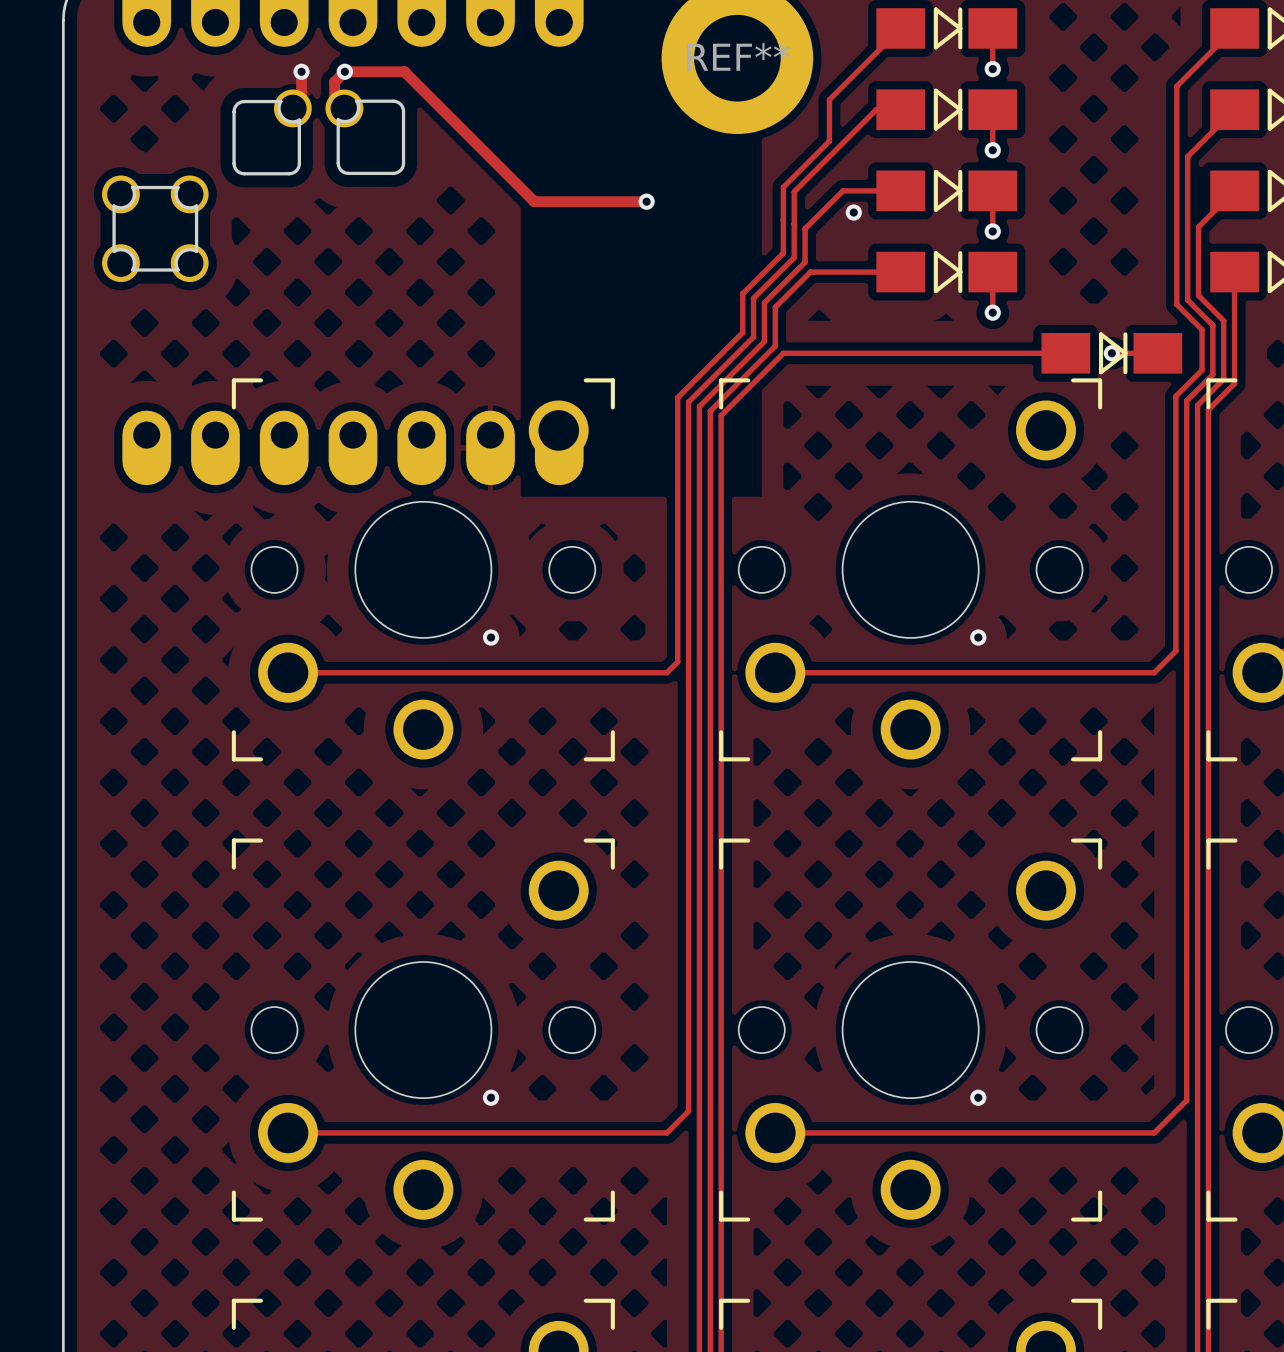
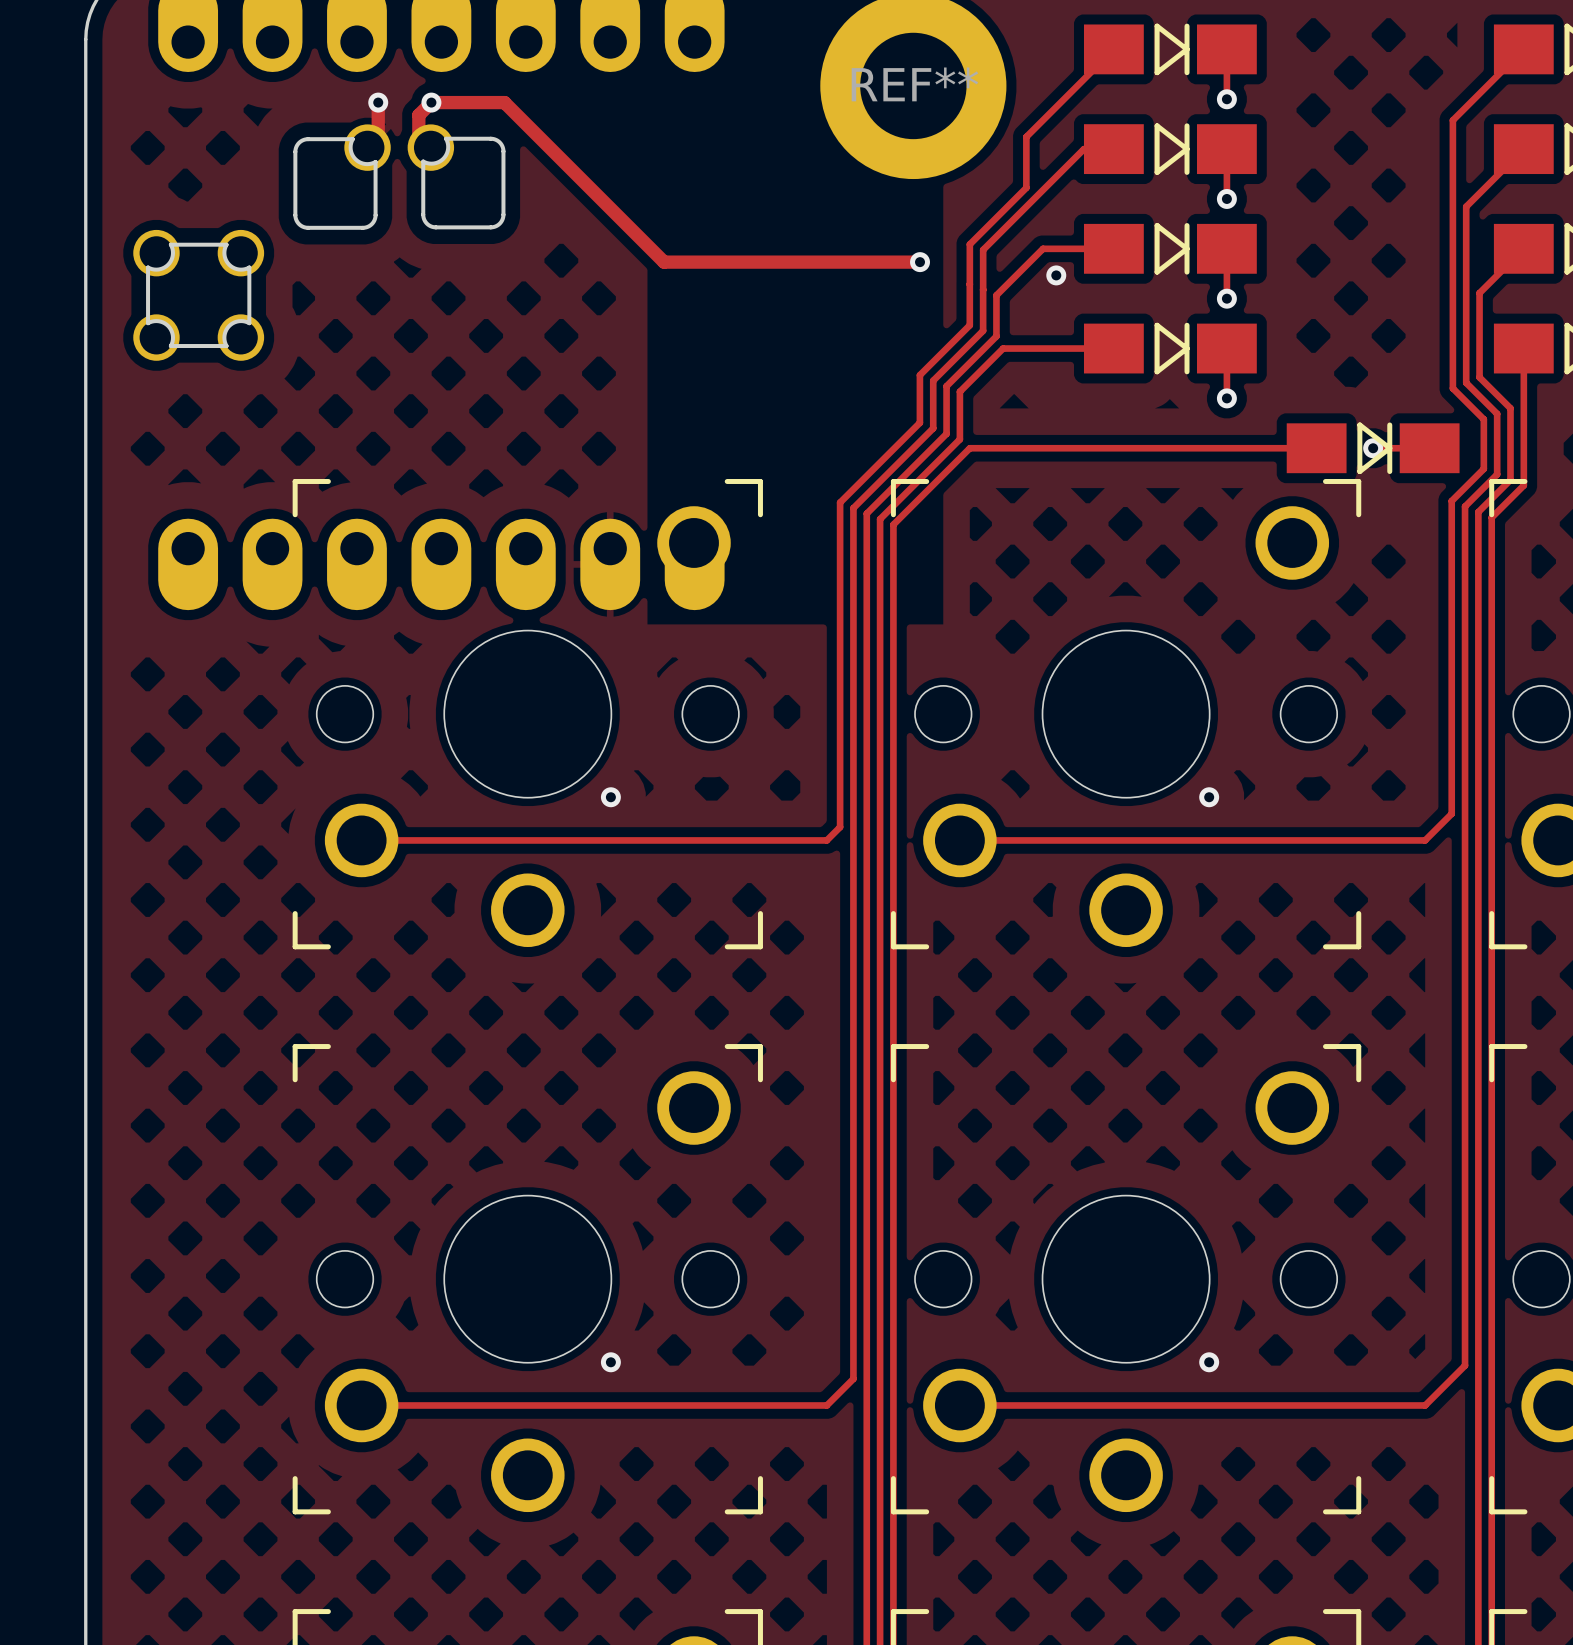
track: none -> (801, 262) (920, 262)
via position: (646, 201) -> (920, 262)

